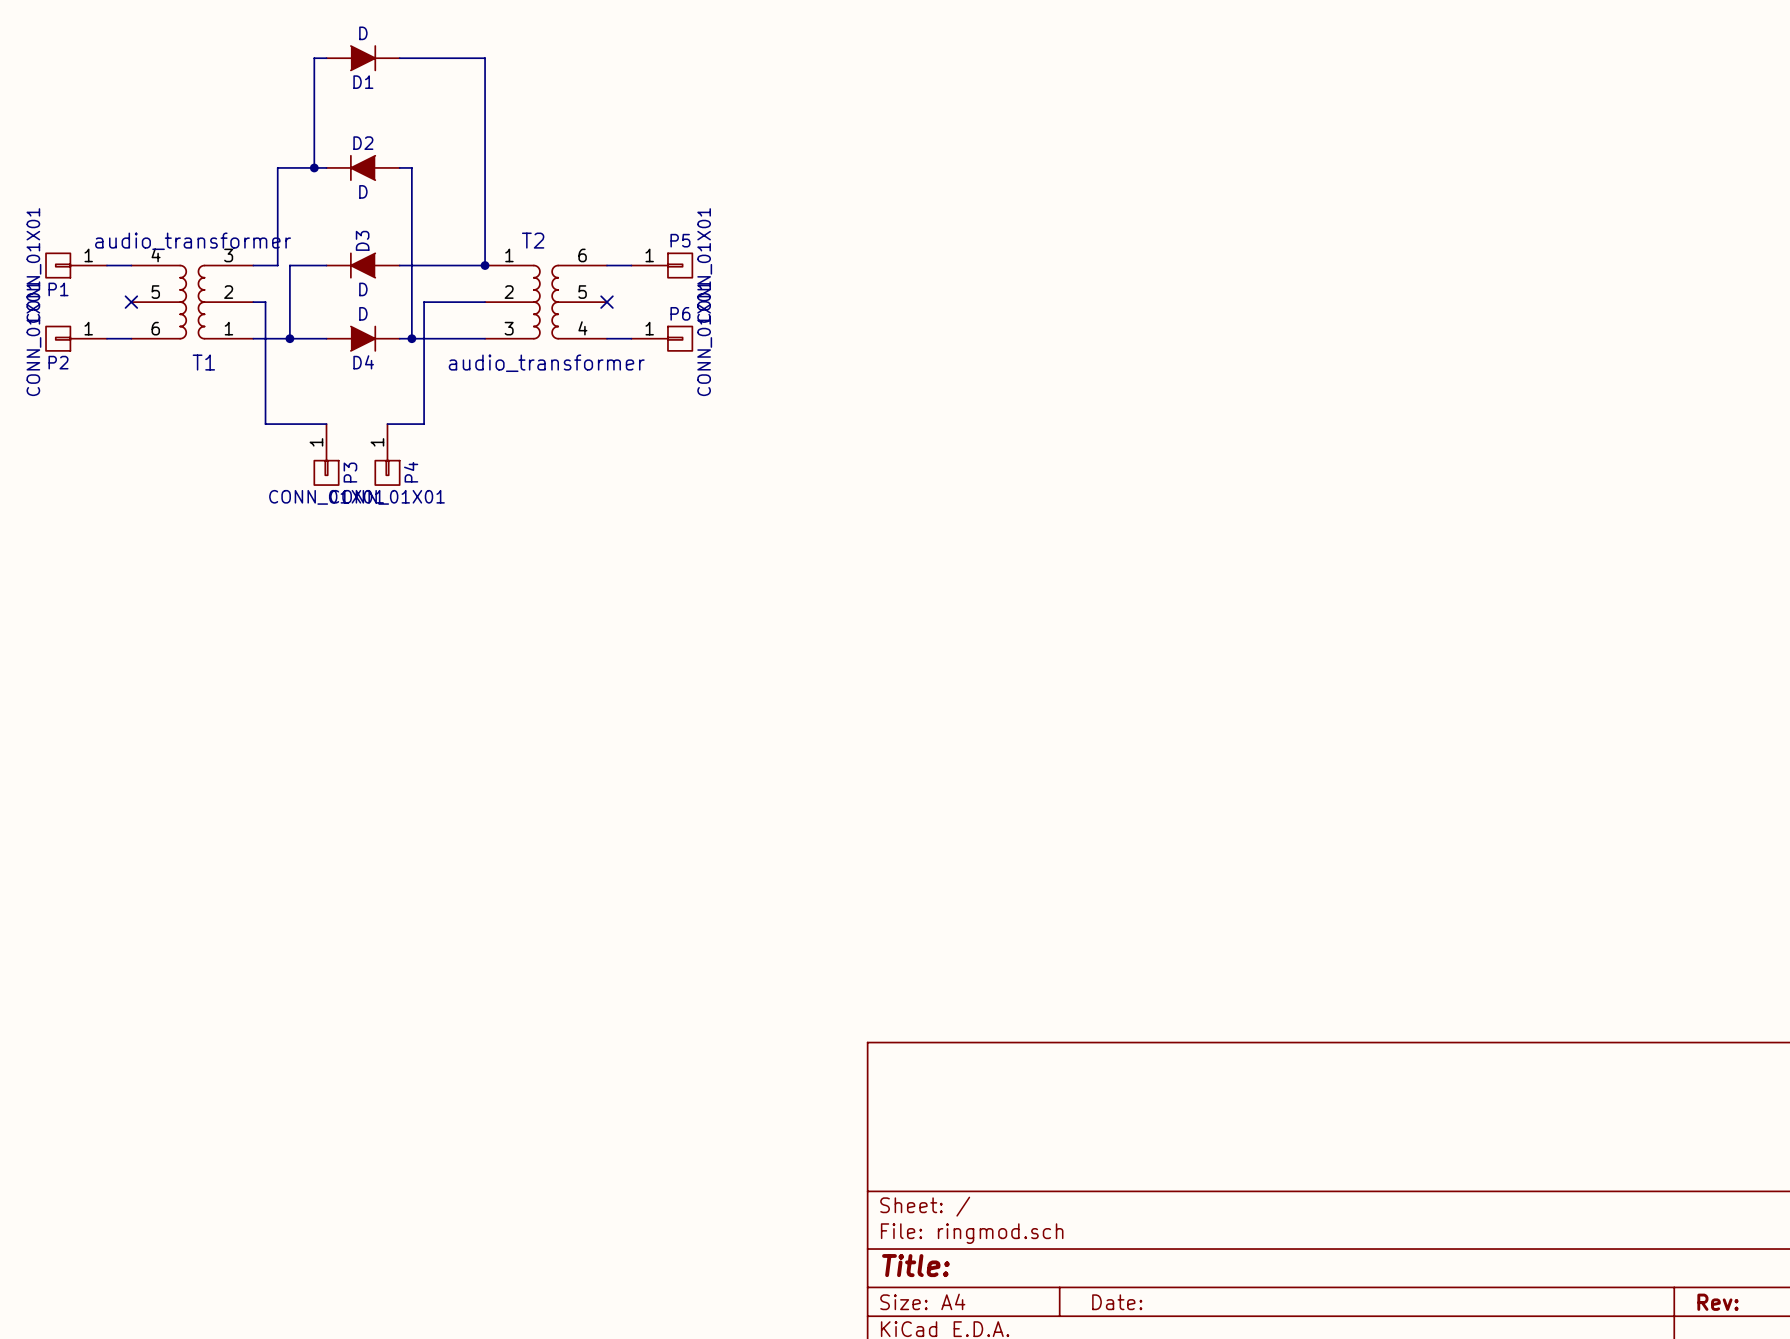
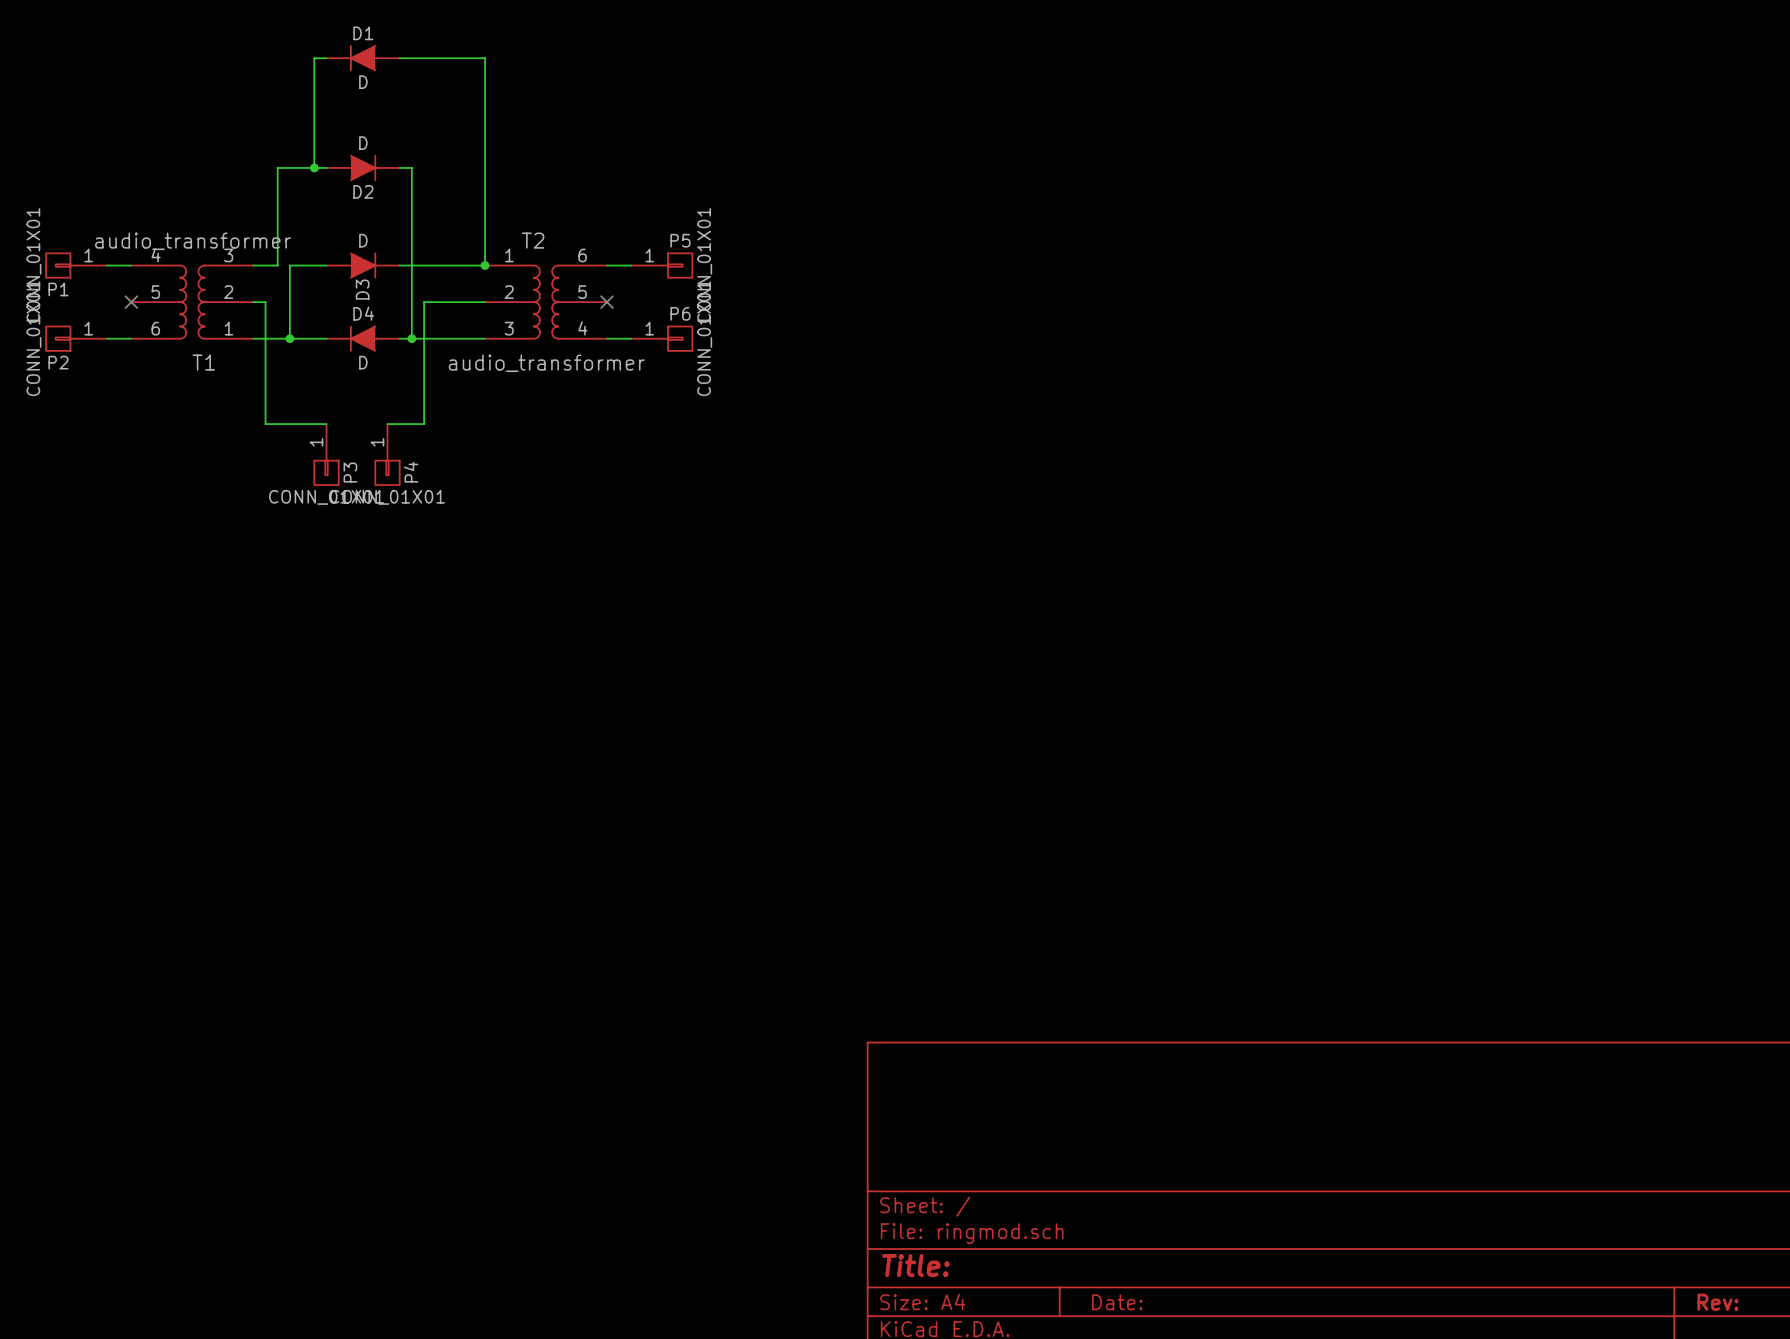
D1 rotation: 0° (363, 58) -> 180° (362, 58)
D2 rotation: 0° (362, 167) -> 180° (363, 167)
D3 rotation: 0° (362, 265) -> 180° (363, 265)
D4 rotation: 0° (363, 338) -> 180° (362, 338)

